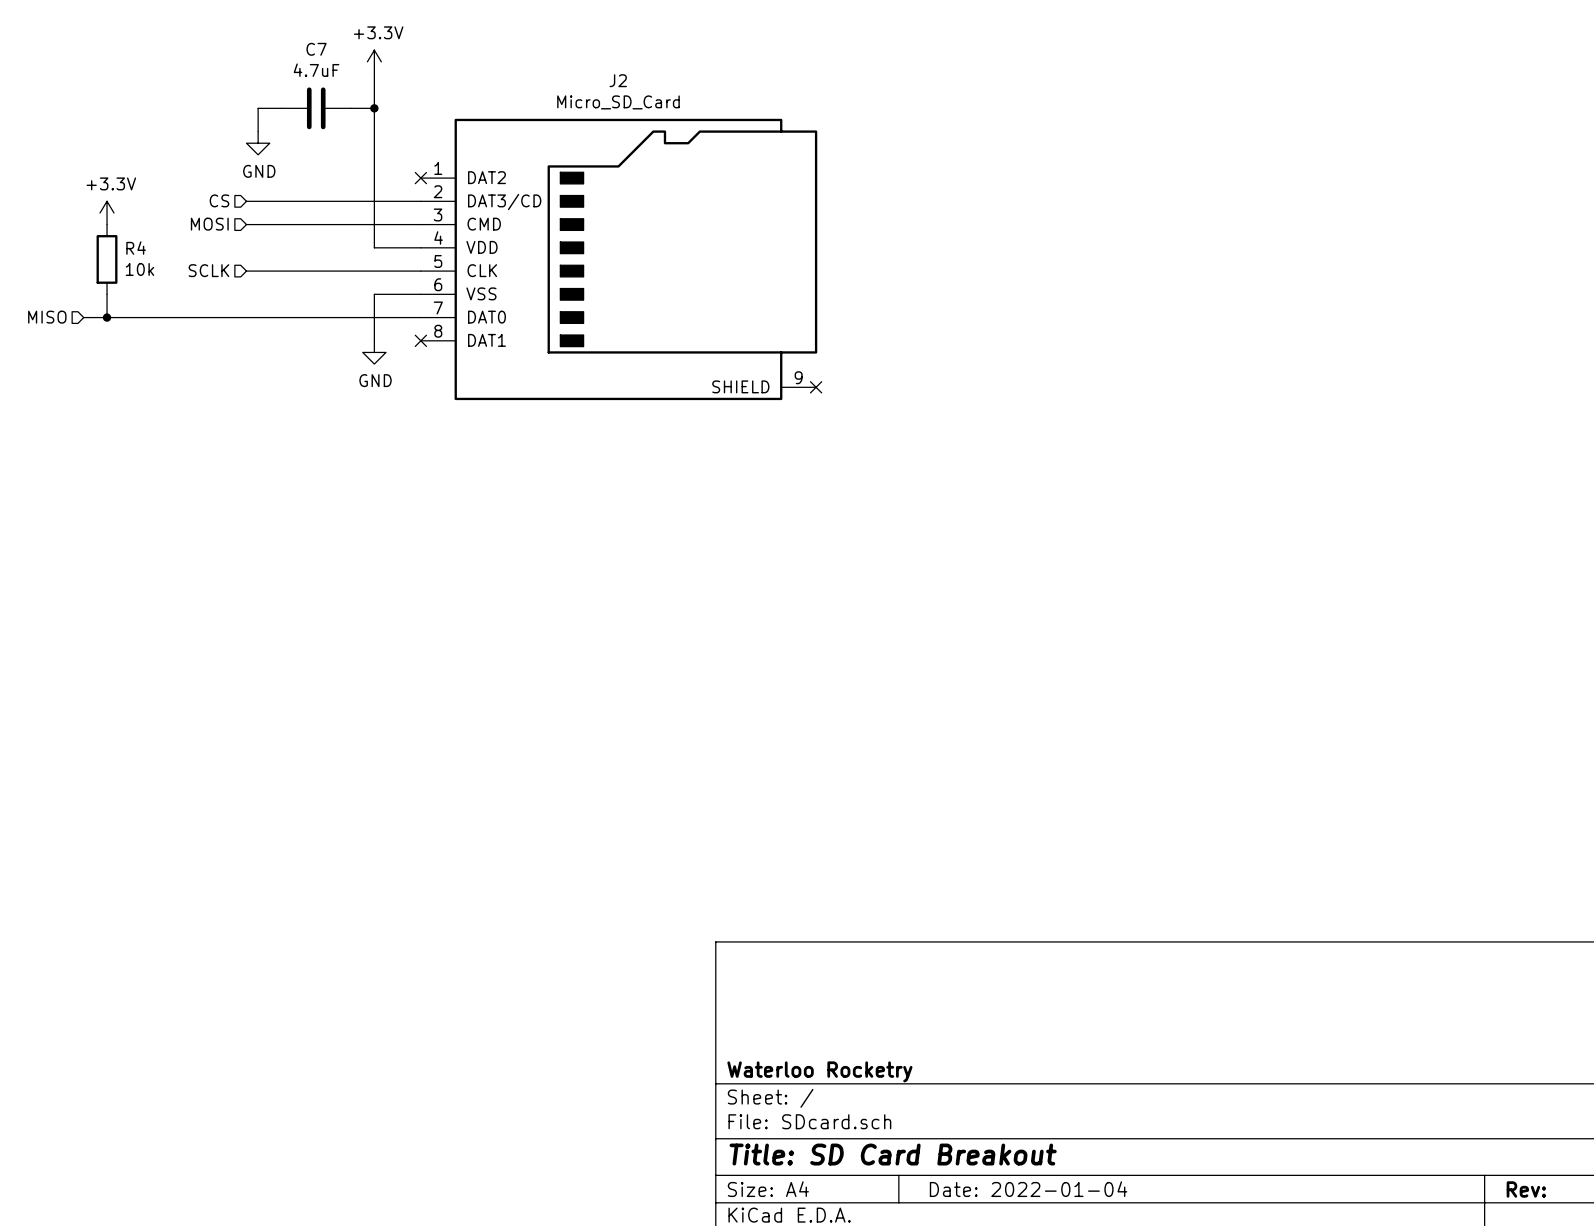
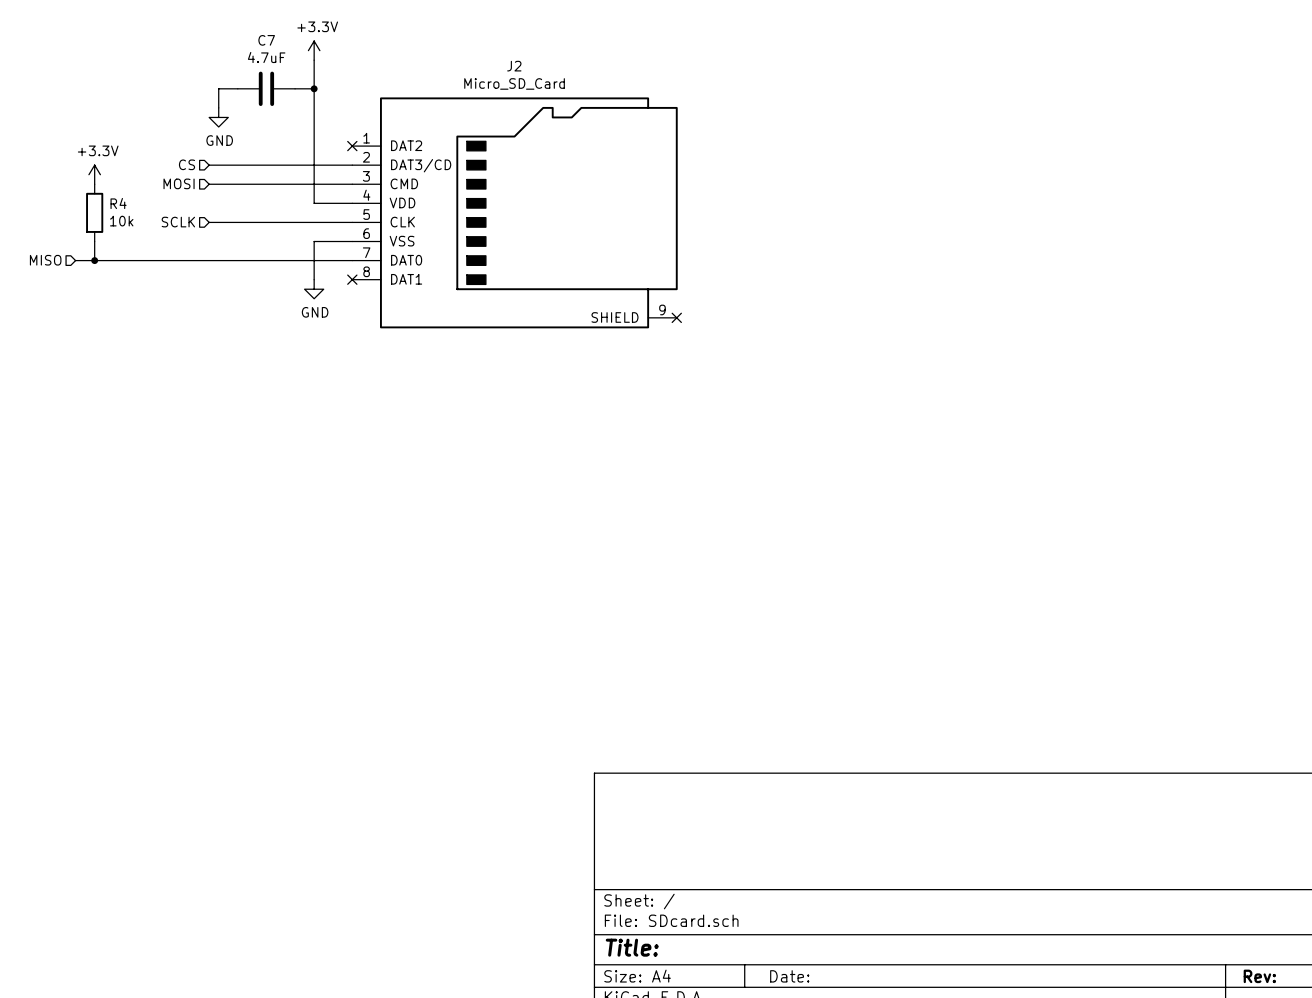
title block: Waterloo Rocketry (819, 1071) -> none
title block: Title: SD Card Breakout (893, 1154) -> Title: (632, 947)
title block: Date: 2022-01-04 (1028, 1189) -> Date: (789, 976)

